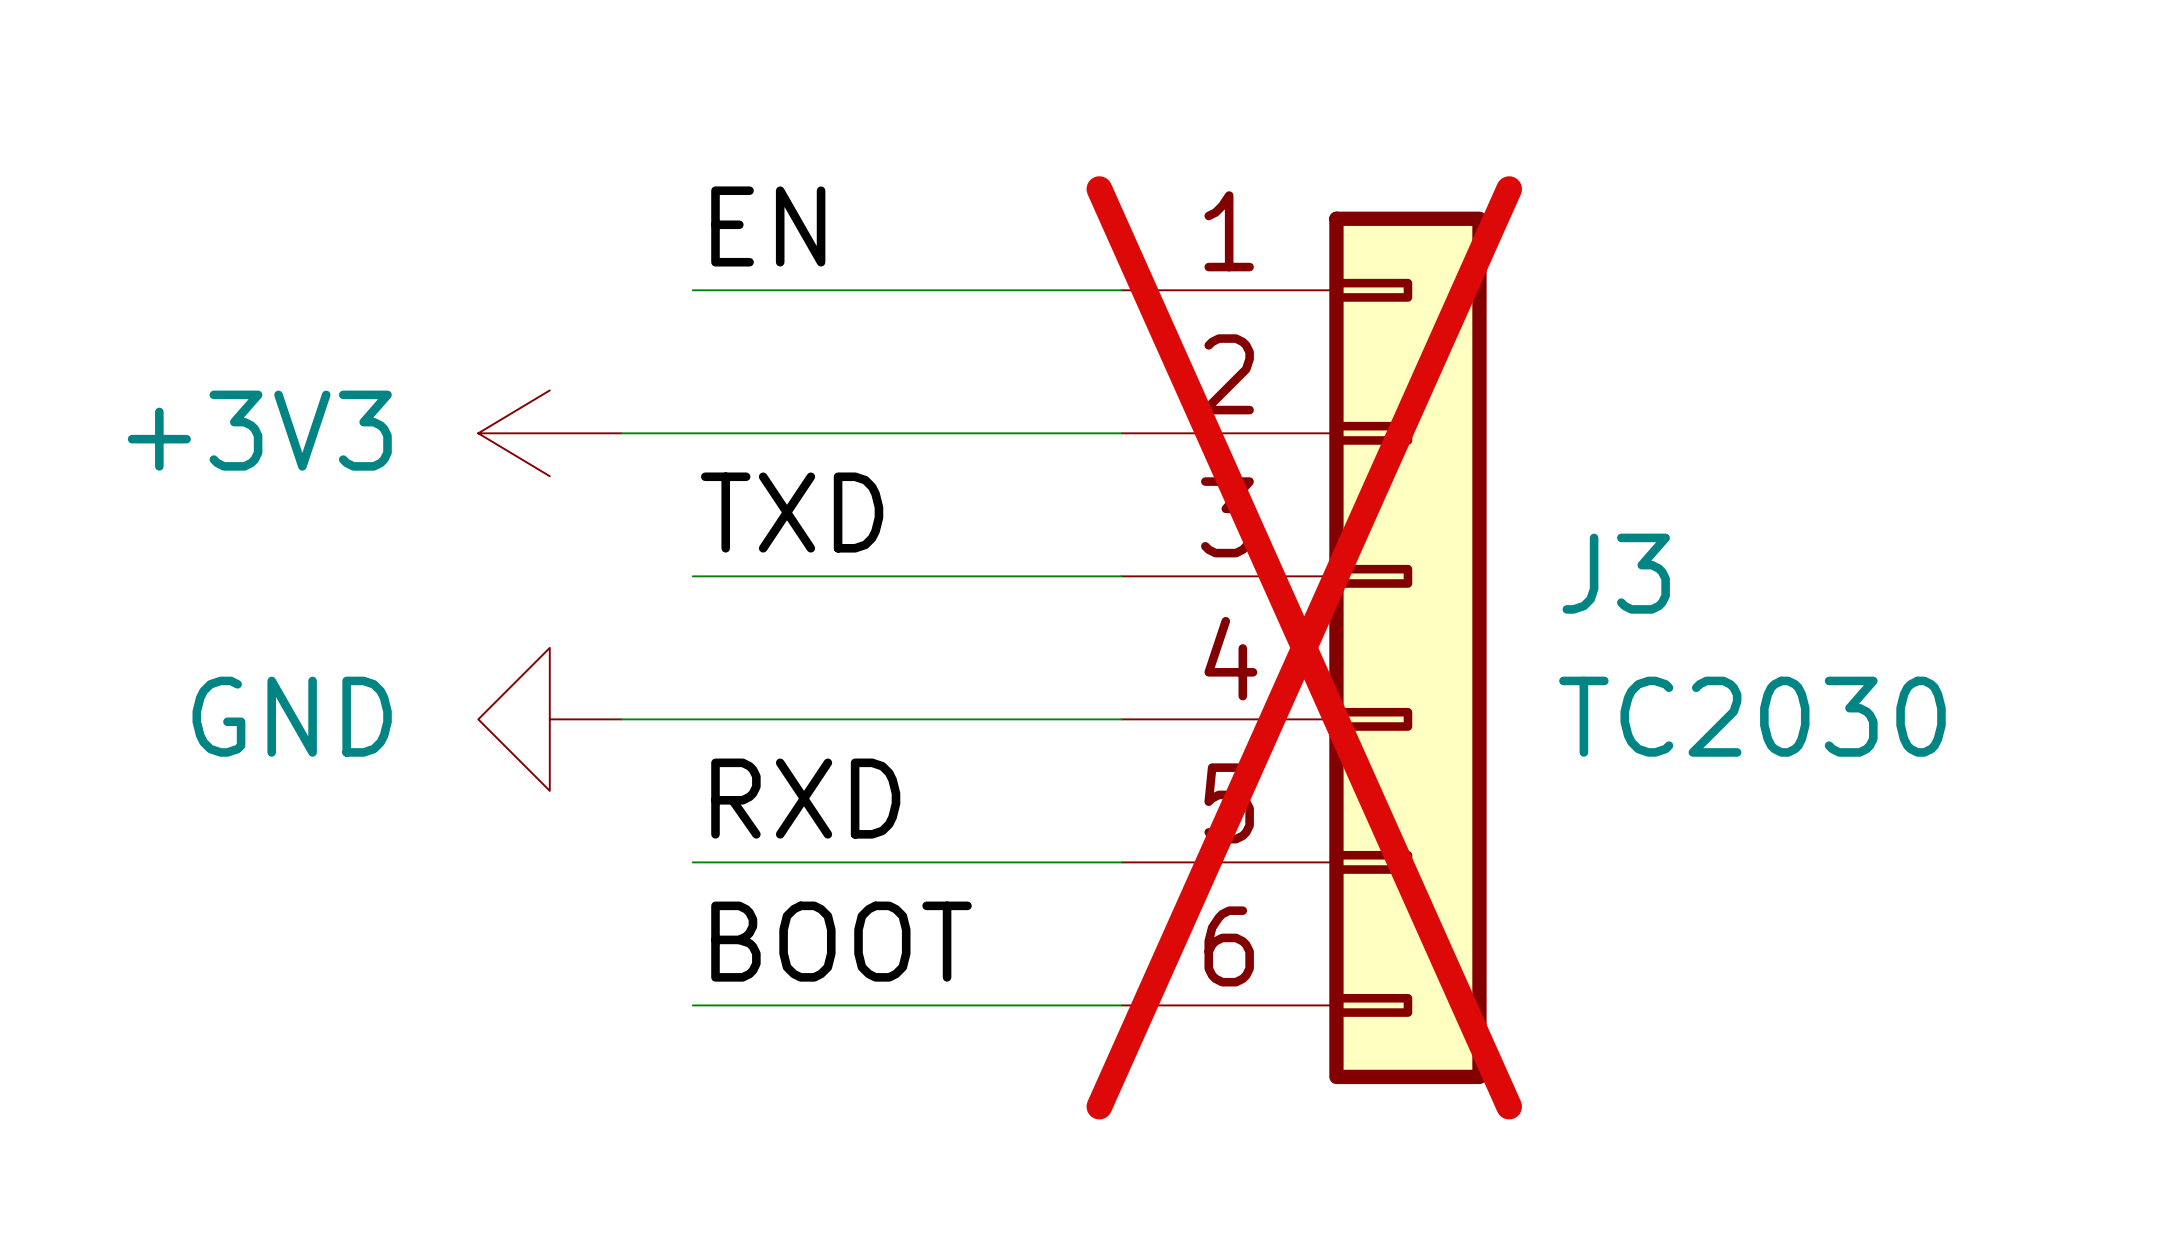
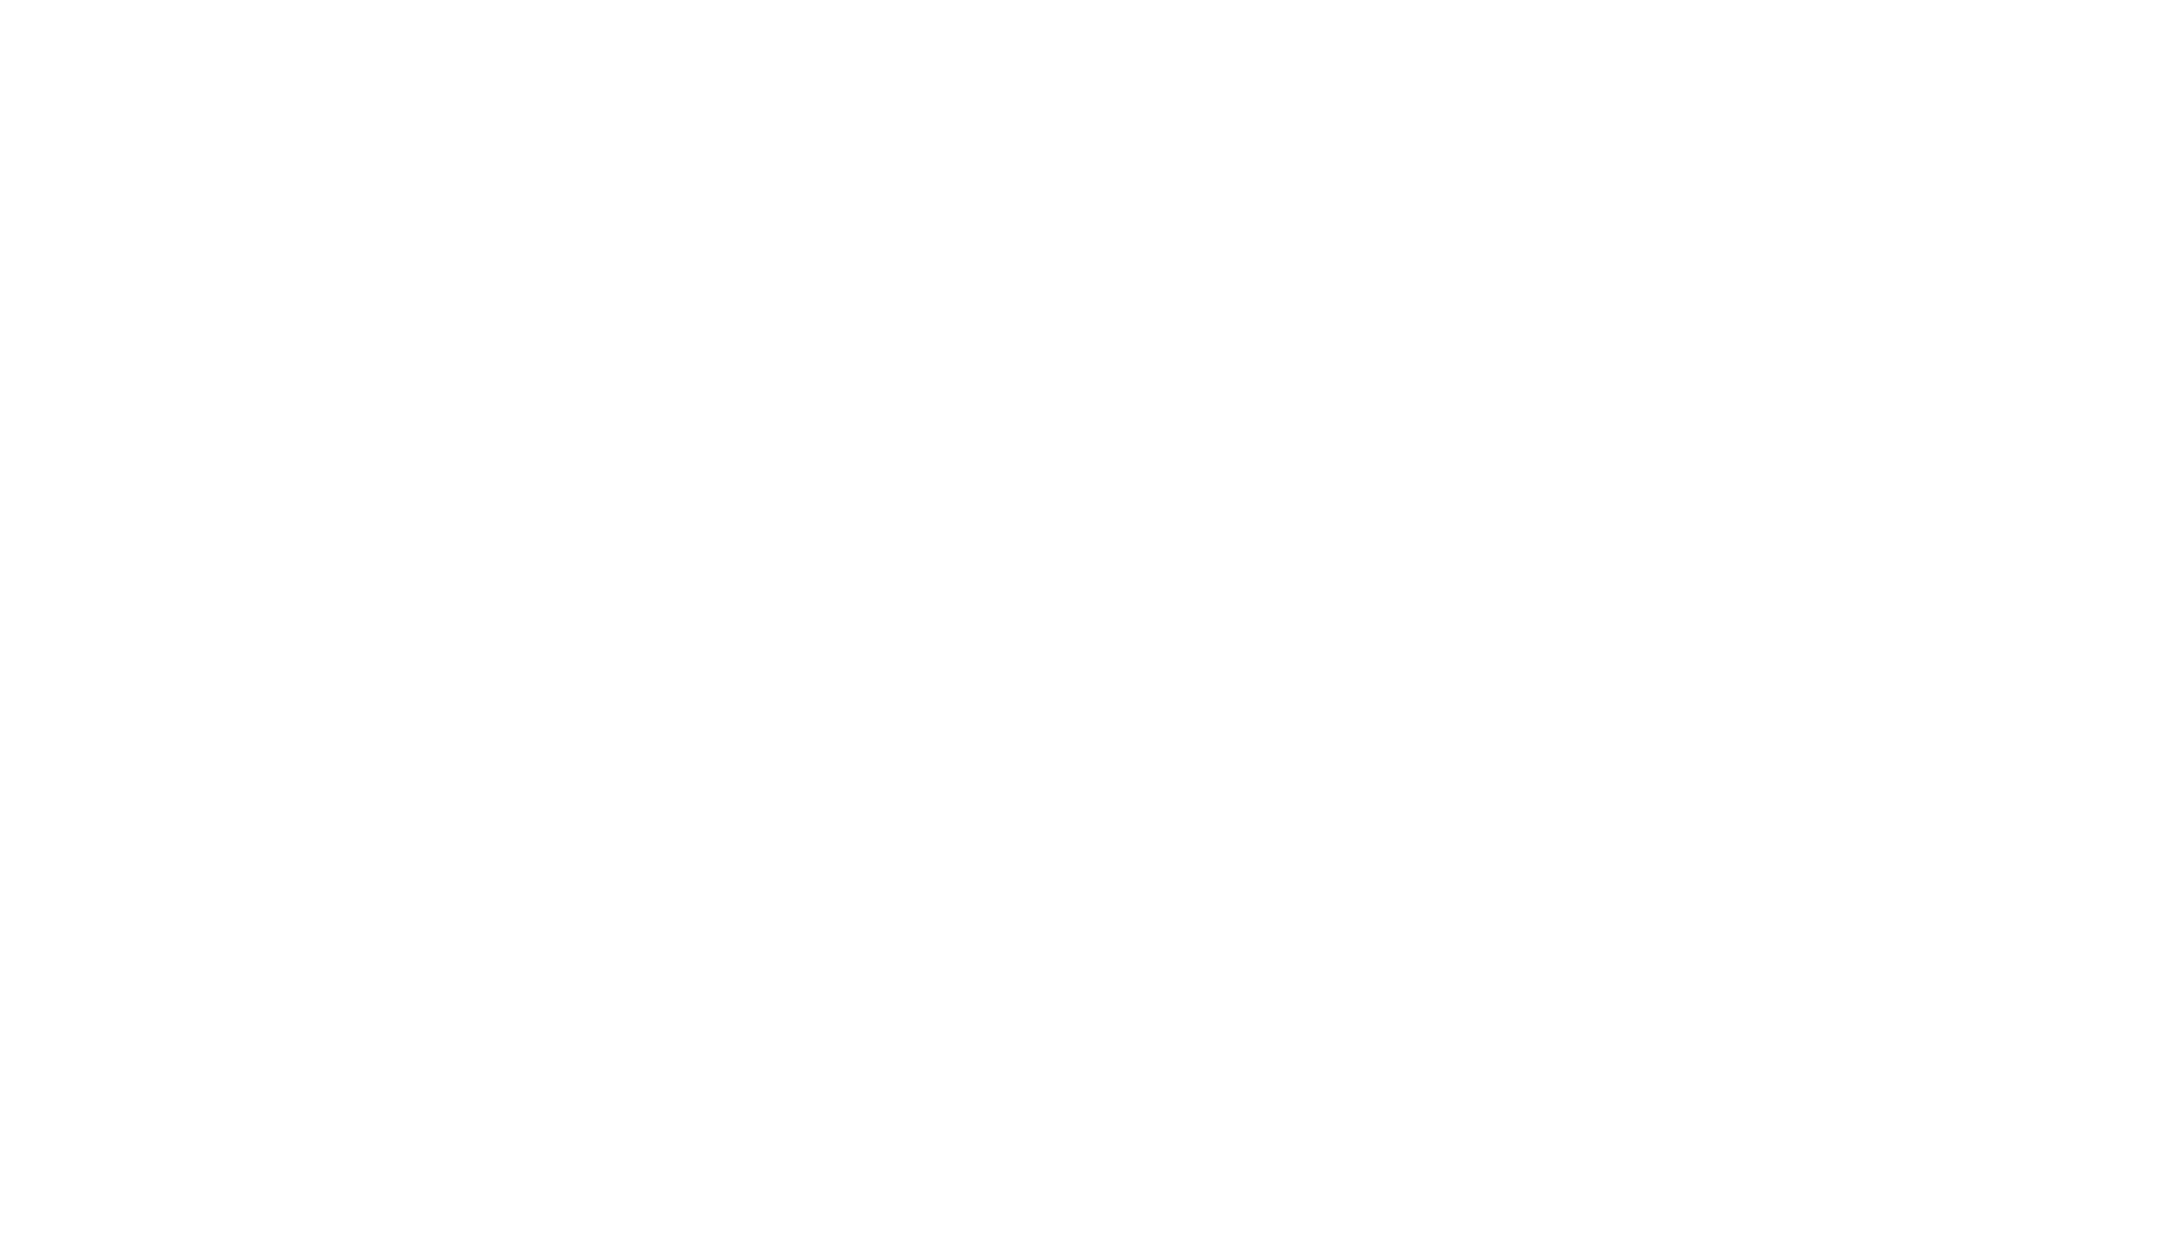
label: EN (768, 226) -> none
wire: (692, 290) (1121, 290) -> none
power symbol: +3V3 (549, 433) -> none
wire: (621, 433) (1121, 433) -> none
label: TXD (792, 512) -> none
wire: (692, 576) (1121, 576) -> none
J3: TC2030 (1304, 647) -> none
power symbol: GND (549, 719) -> none
wire: (621, 719) (1121, 719) -> none
label: RXD (805, 798) -> none
wire: (692, 862) (1121, 862) -> none
label: BOOT (841, 941) -> none
wire: (692, 1005) (1121, 1005) -> none

